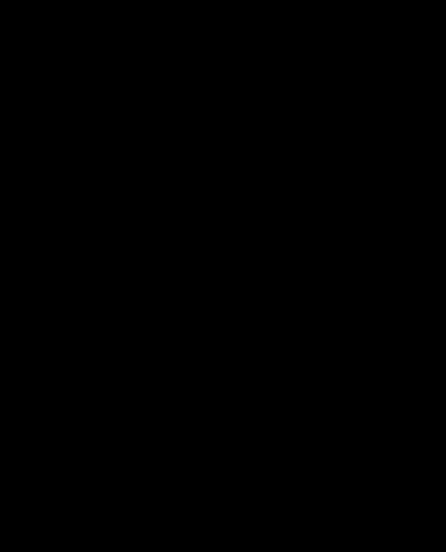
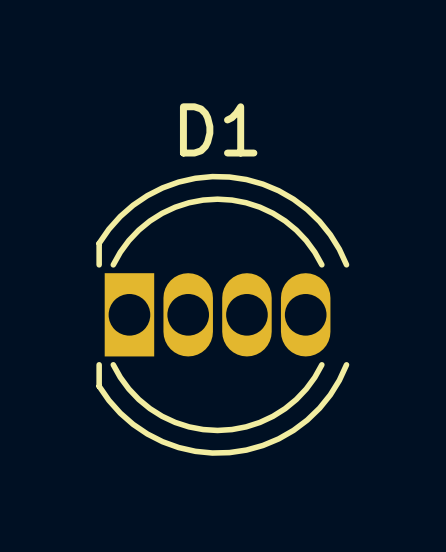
D1: none -> (222, 314)

